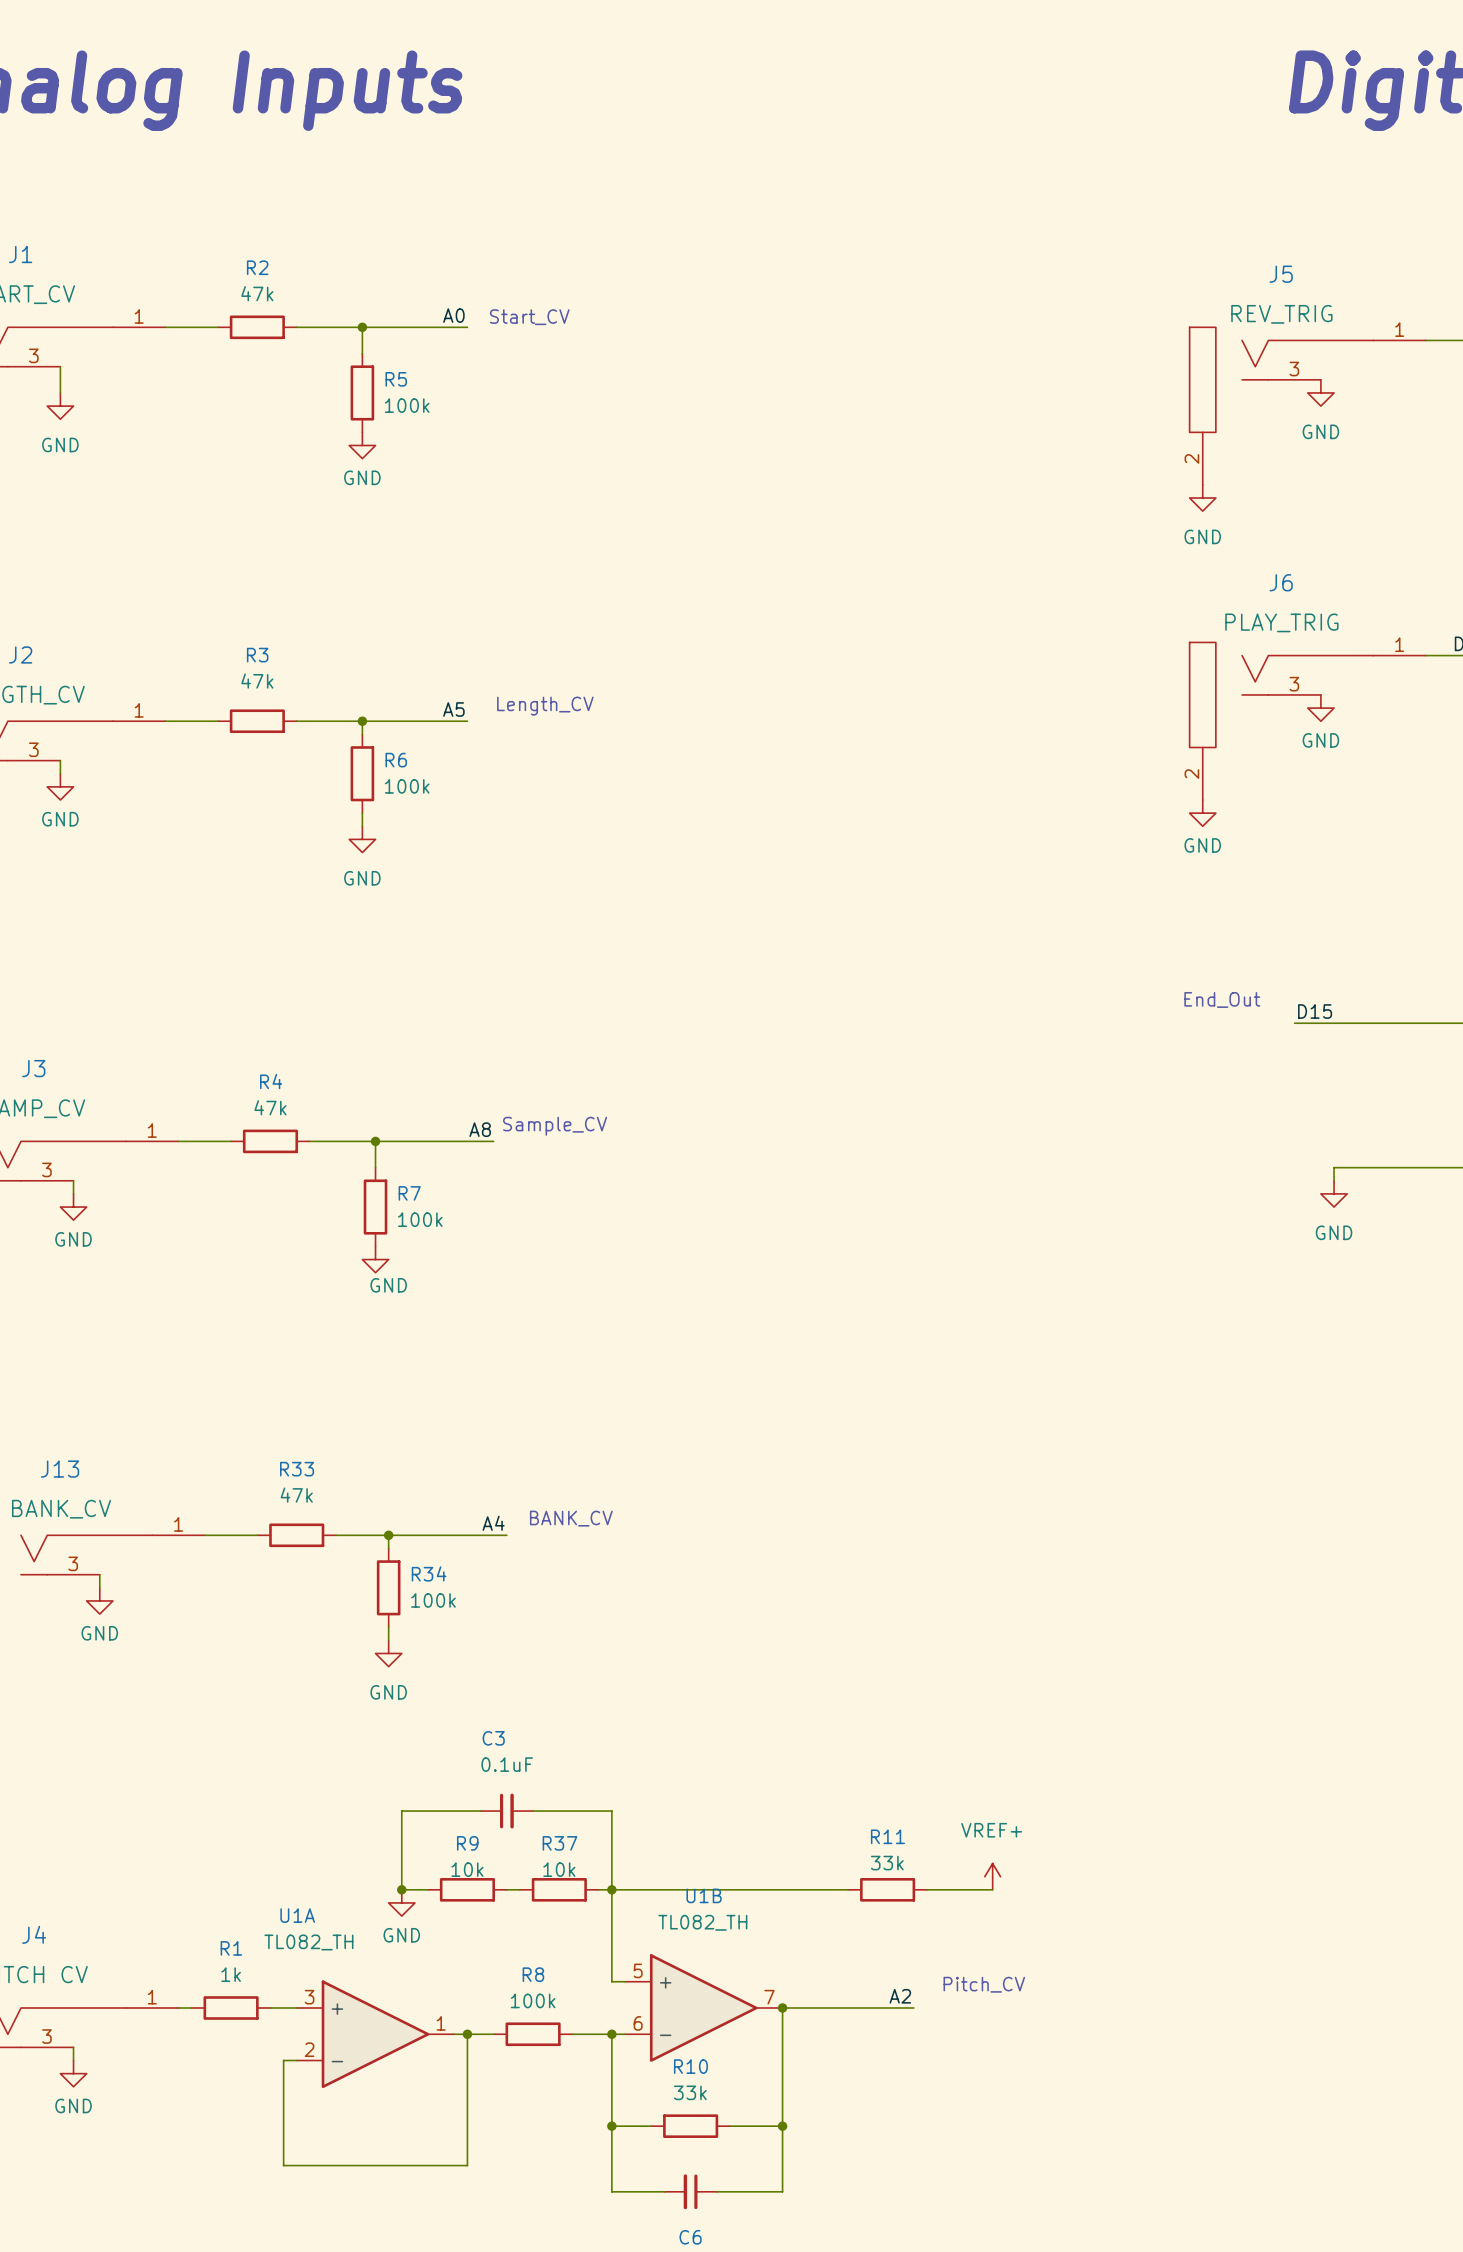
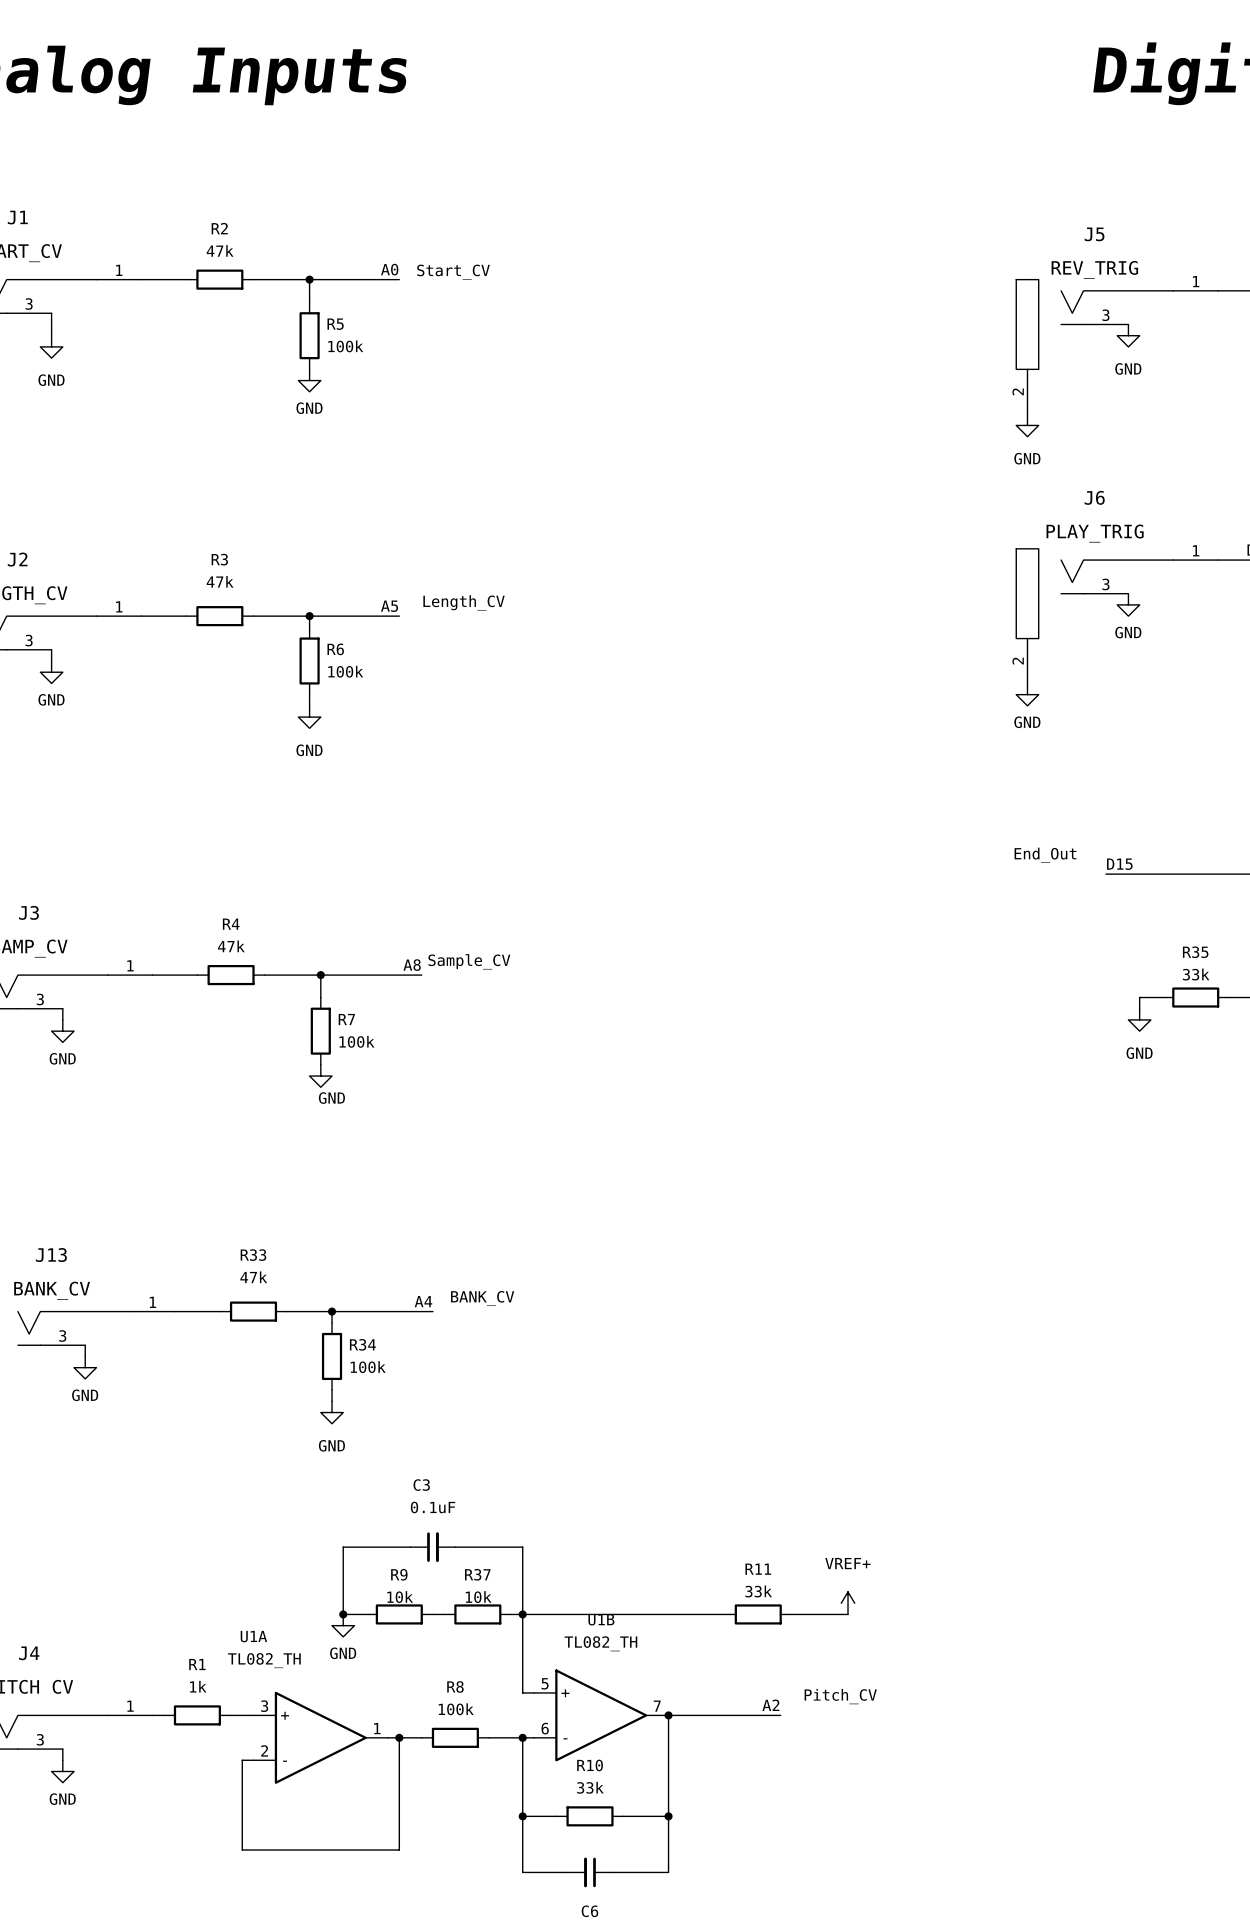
wire: (1360, 1167) (1439, 1167) -> none
R35: none -> (1195, 997)

